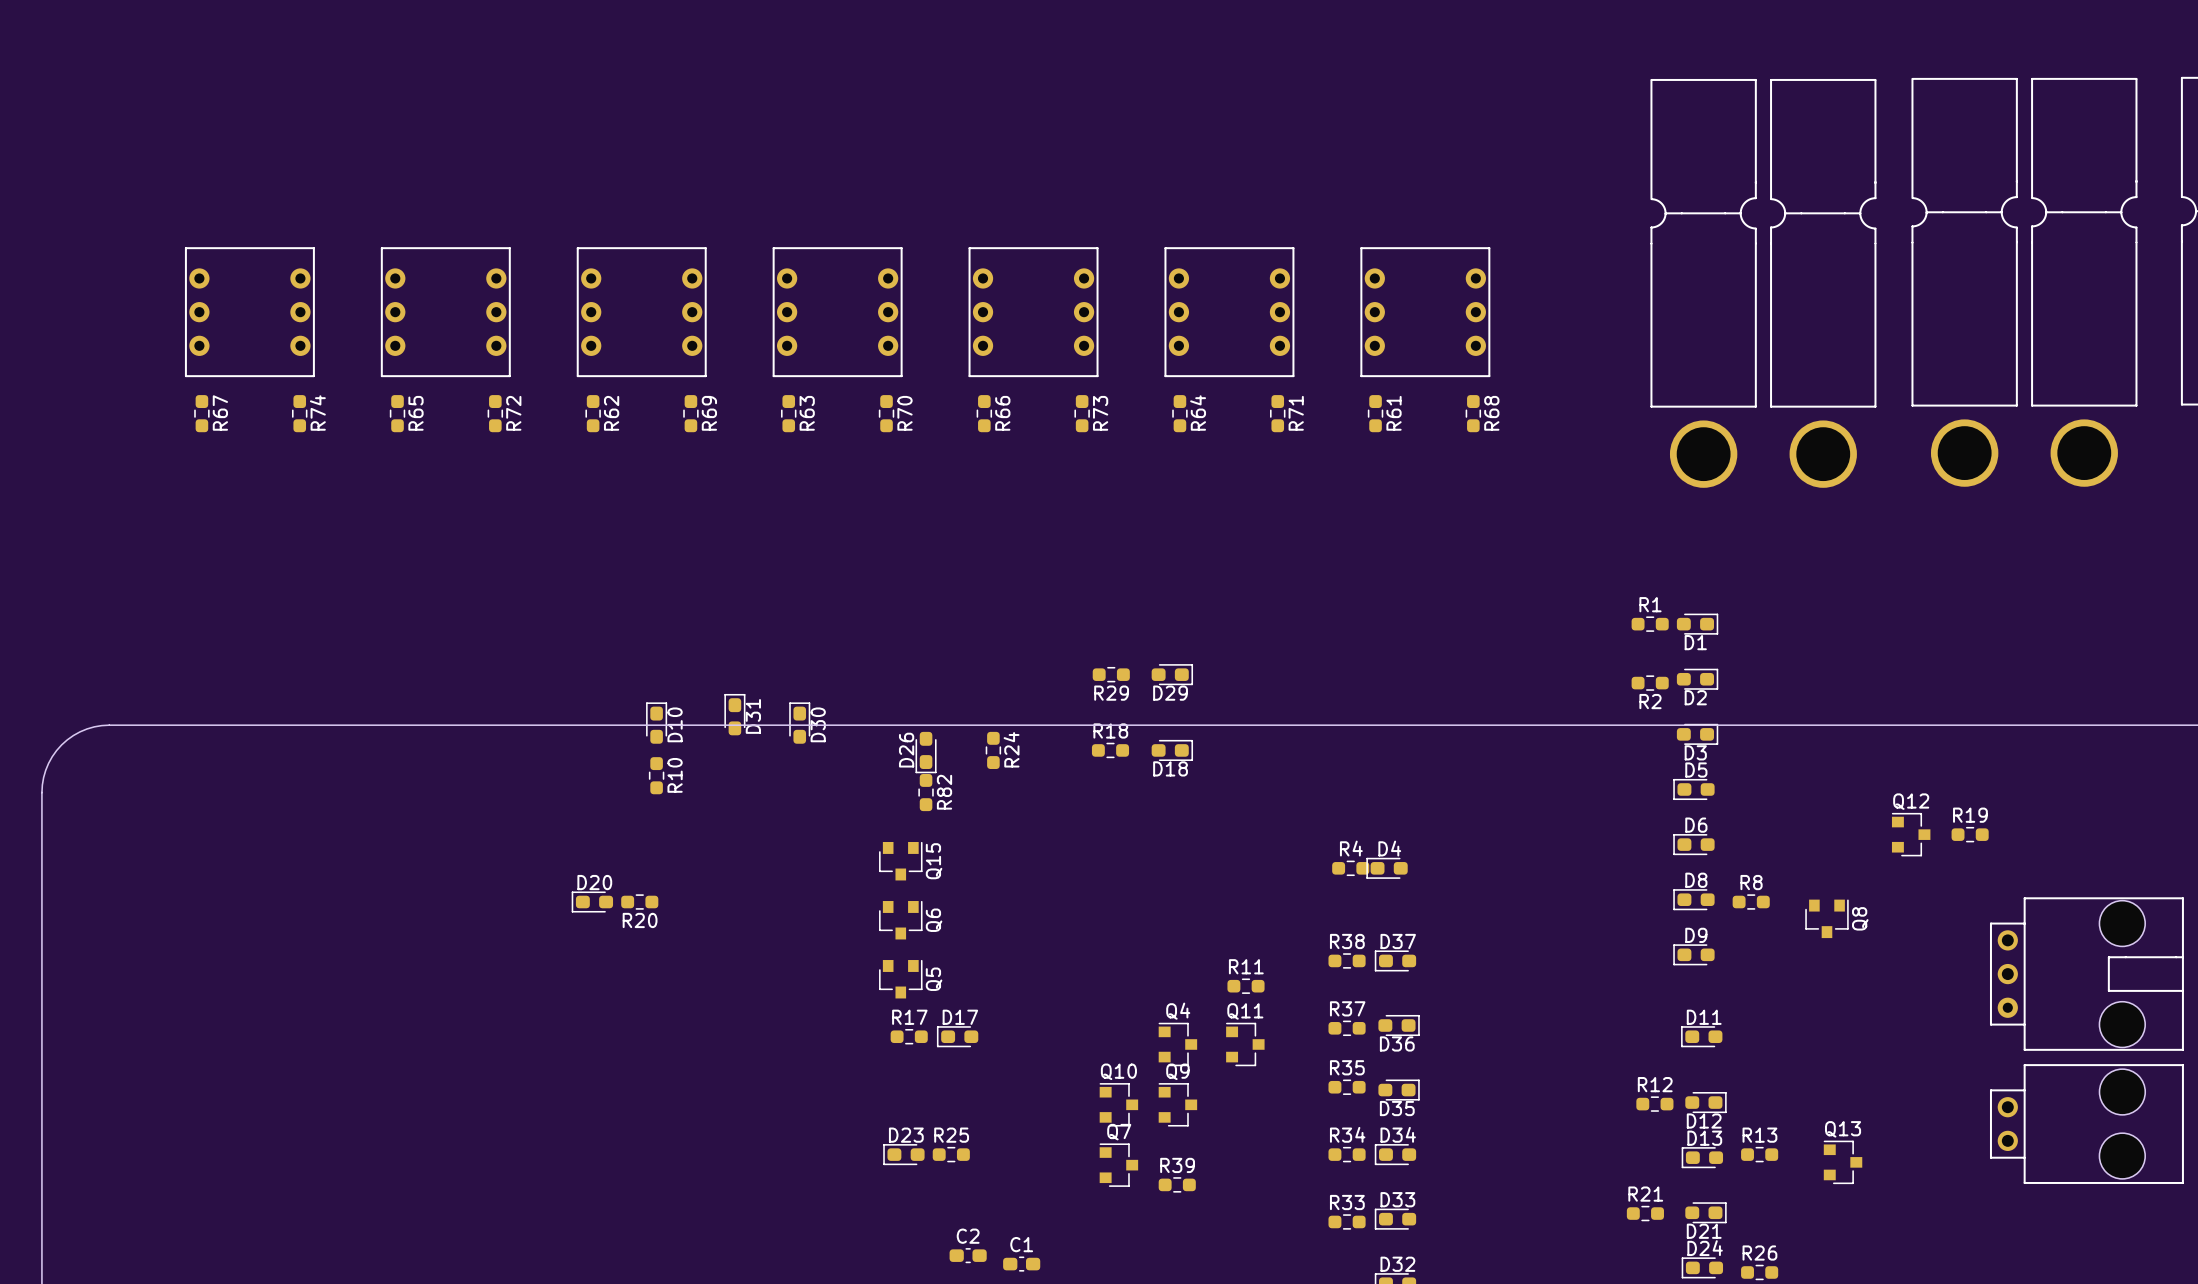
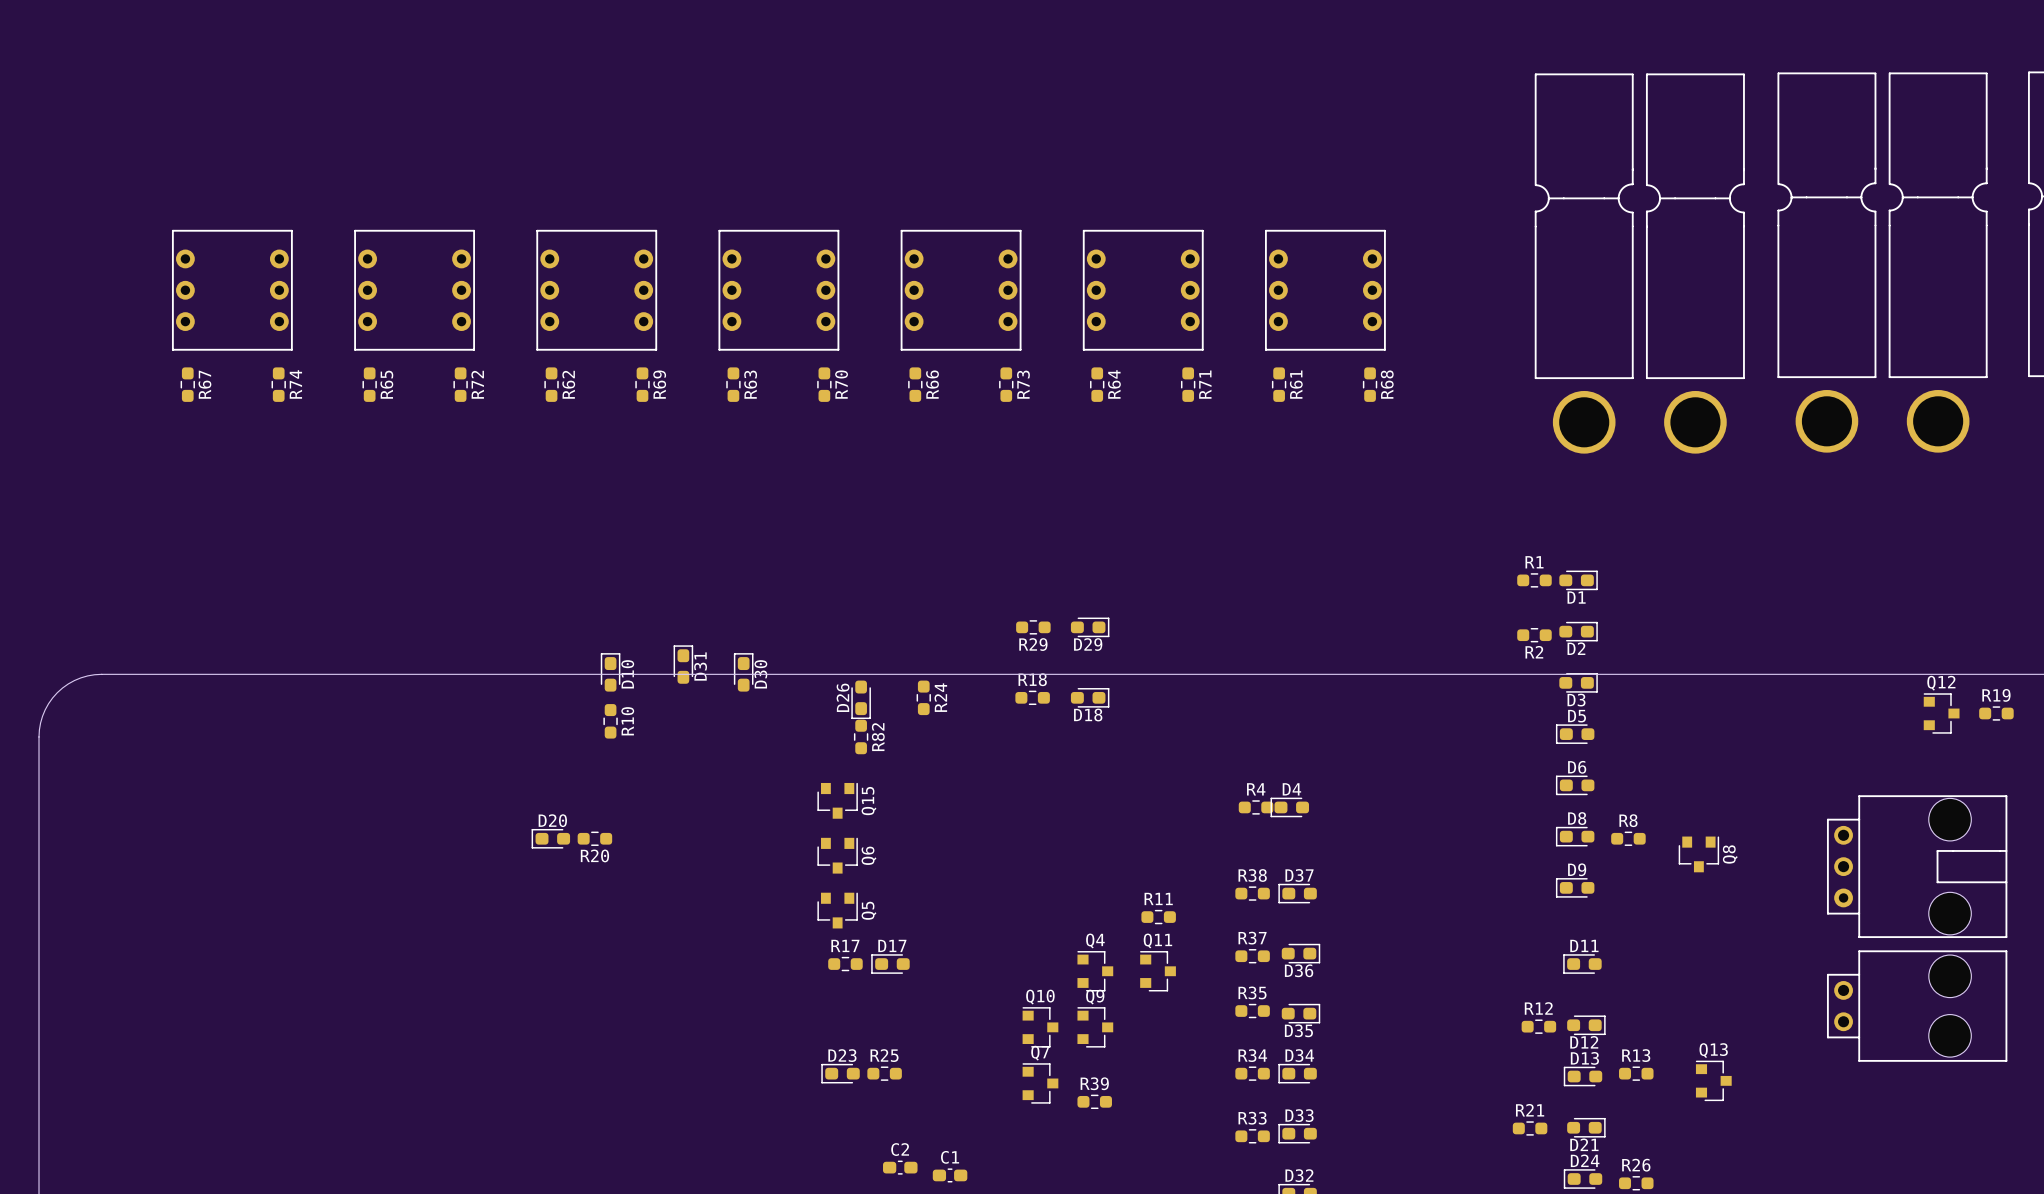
Q12 position: (1911, 834) -> (1941, 713)
R19 position: (1970, 834) -> (1996, 713)
part position: (2086, 974) -> (1917, 866)
part position: (2086, 1124) -> (1917, 1006)

